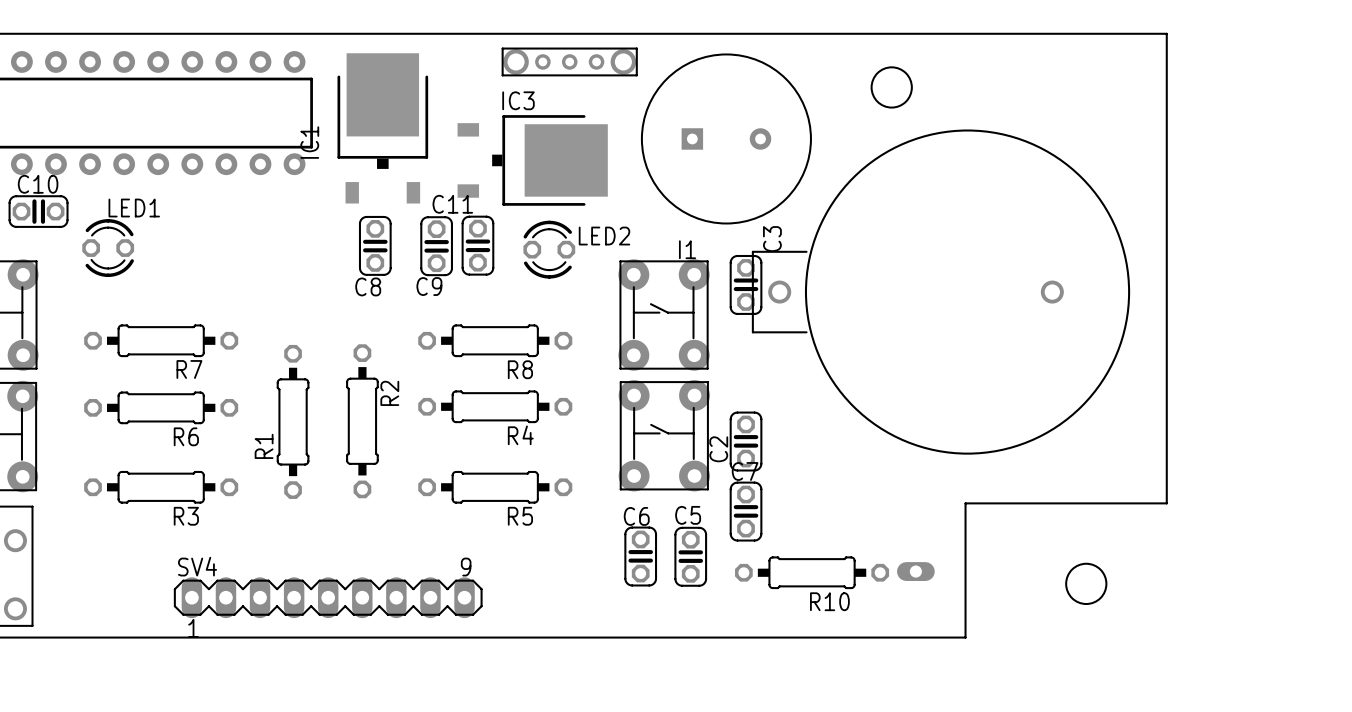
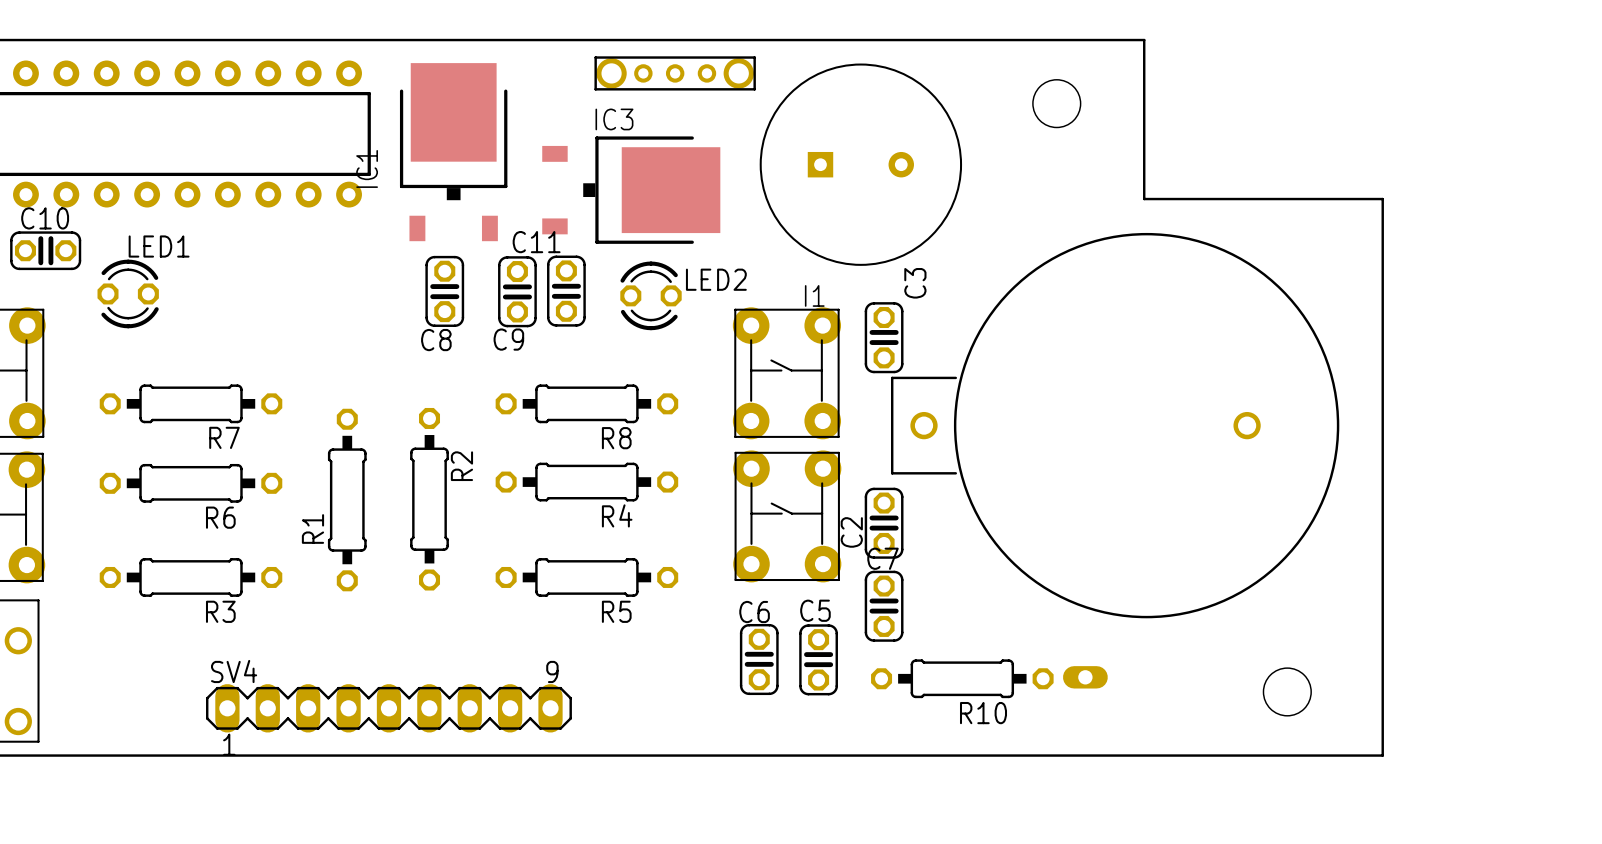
board edge: (965, 33) (1166, 33) (1166, 167) -> (1144, 40) (1144, 199) (1382, 199)
part position: (940, 292) -> (1115, 425)
board edge: (1166, 503) (965, 503) (965, 637) -> (1382, 596) (1382, 755) (1144, 755)

